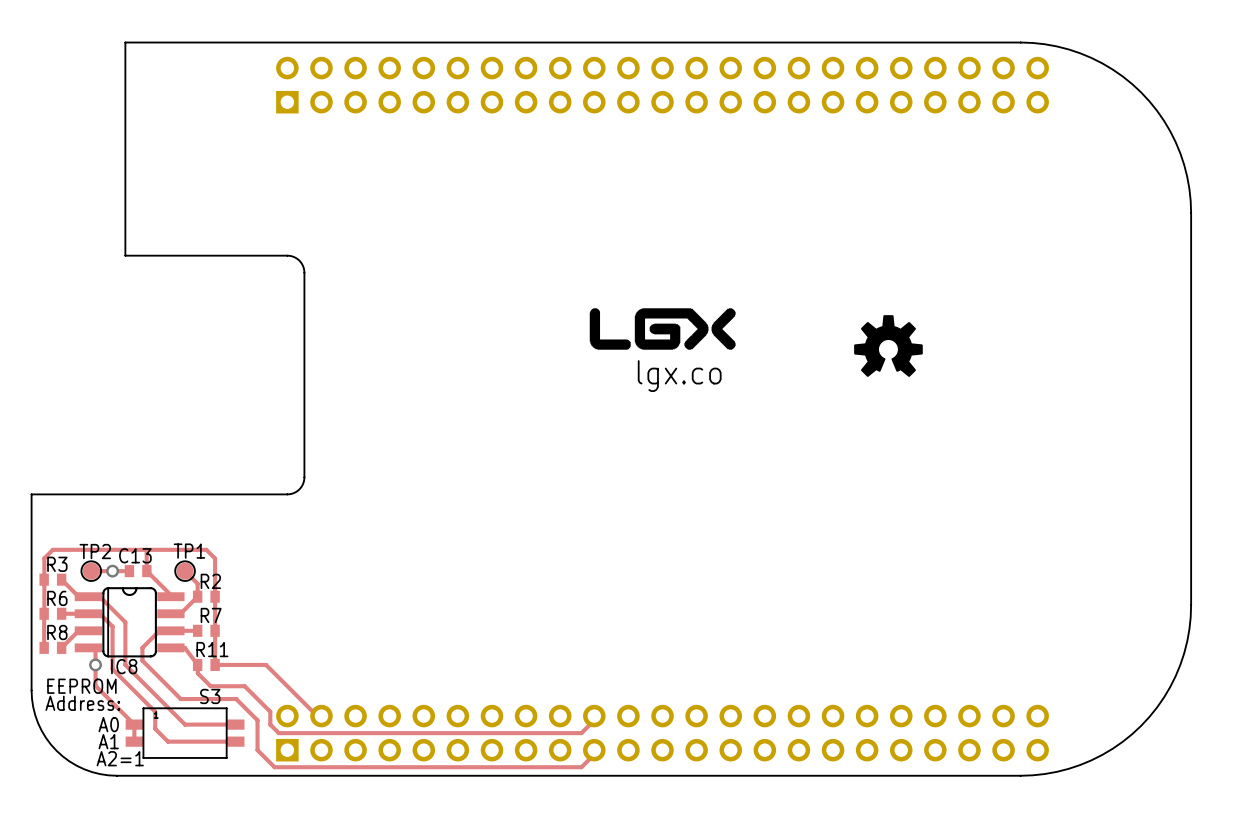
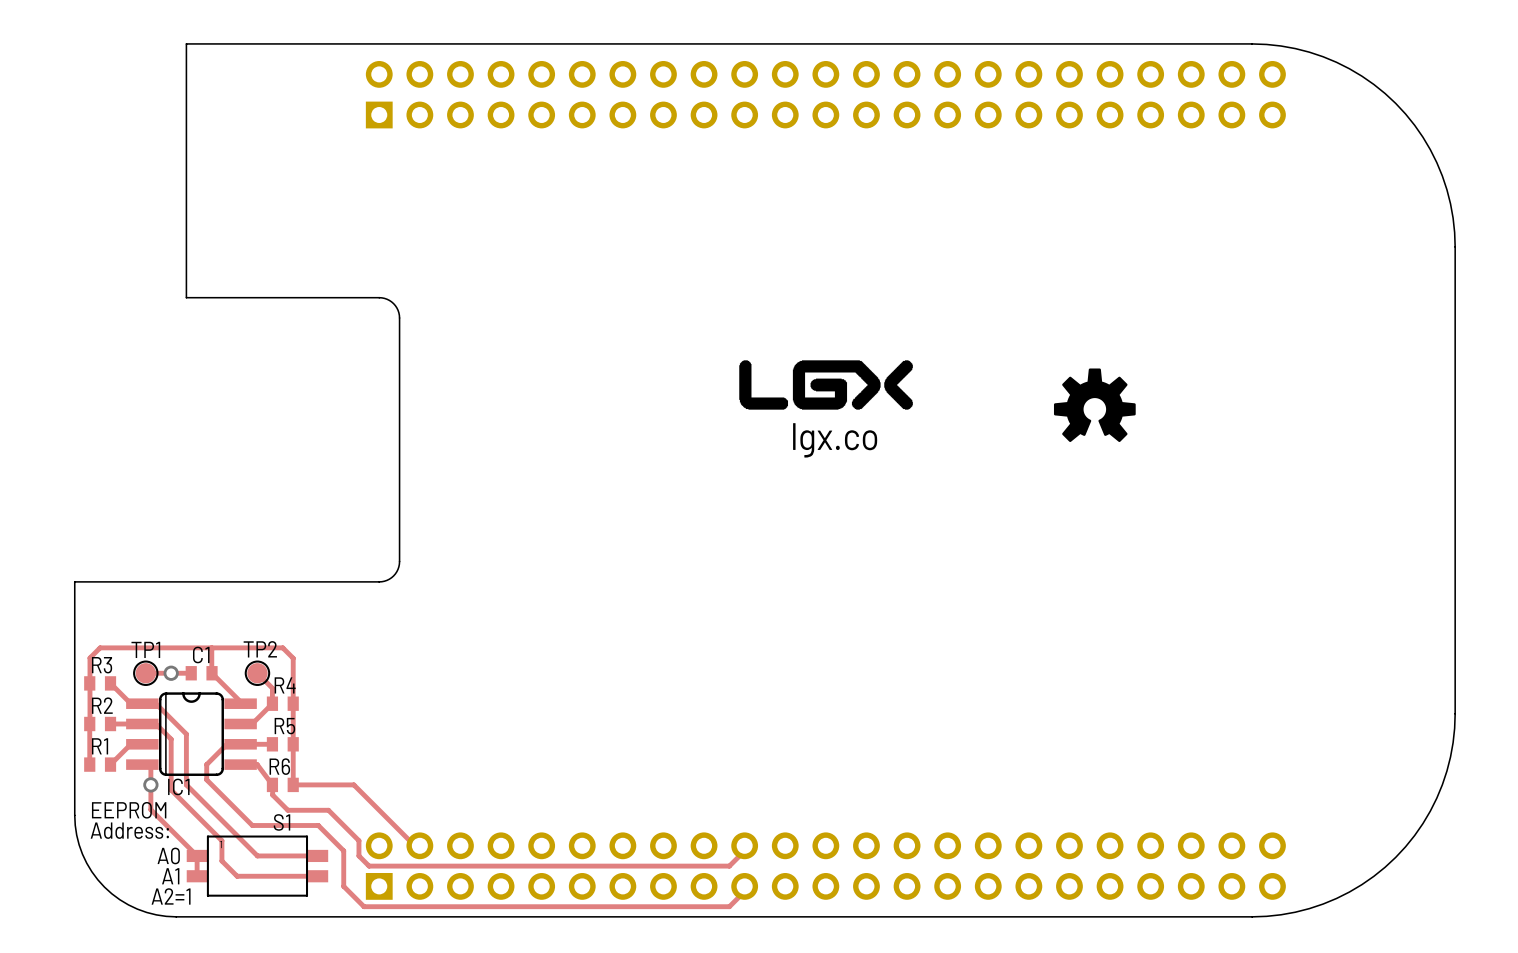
TP2 name: TP2 (95, 551) -> TP1 (145, 649)
TP1 name: TP1 (189, 551) -> TP2 (260, 649)
C13 name: C13 (135, 555) -> C1 (201, 654)
R2 name: R2 (210, 581) -> R4 (285, 685)
R6 name: R6 (57, 598) -> R2 (102, 705)
R7 name: R7 (211, 615) -> R5 (284, 726)
R8 name: R8 (57, 632) -> R1 (100, 746)
R11 name: R11 (212, 649) -> R6 (279, 766)
IC8 name: IC8 (124, 666) -> IC1 (178, 786)
S3 name: S3 (210, 696) -> S1 (282, 822)

